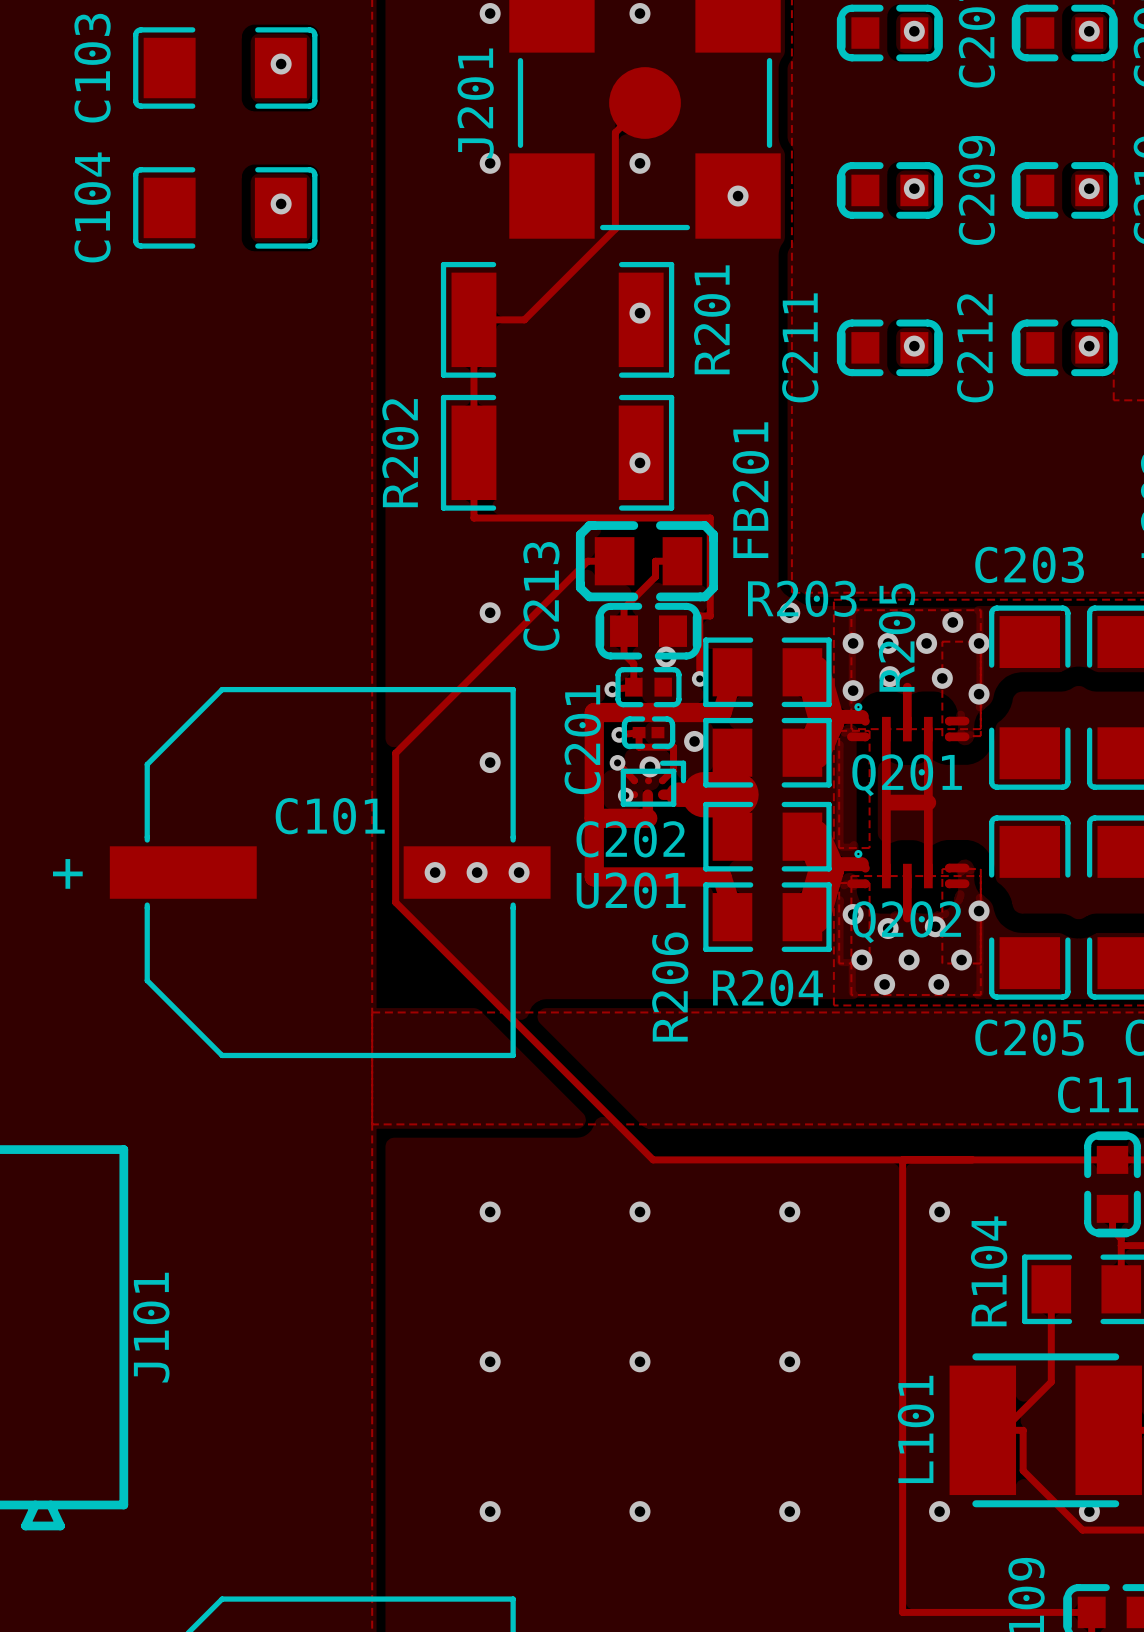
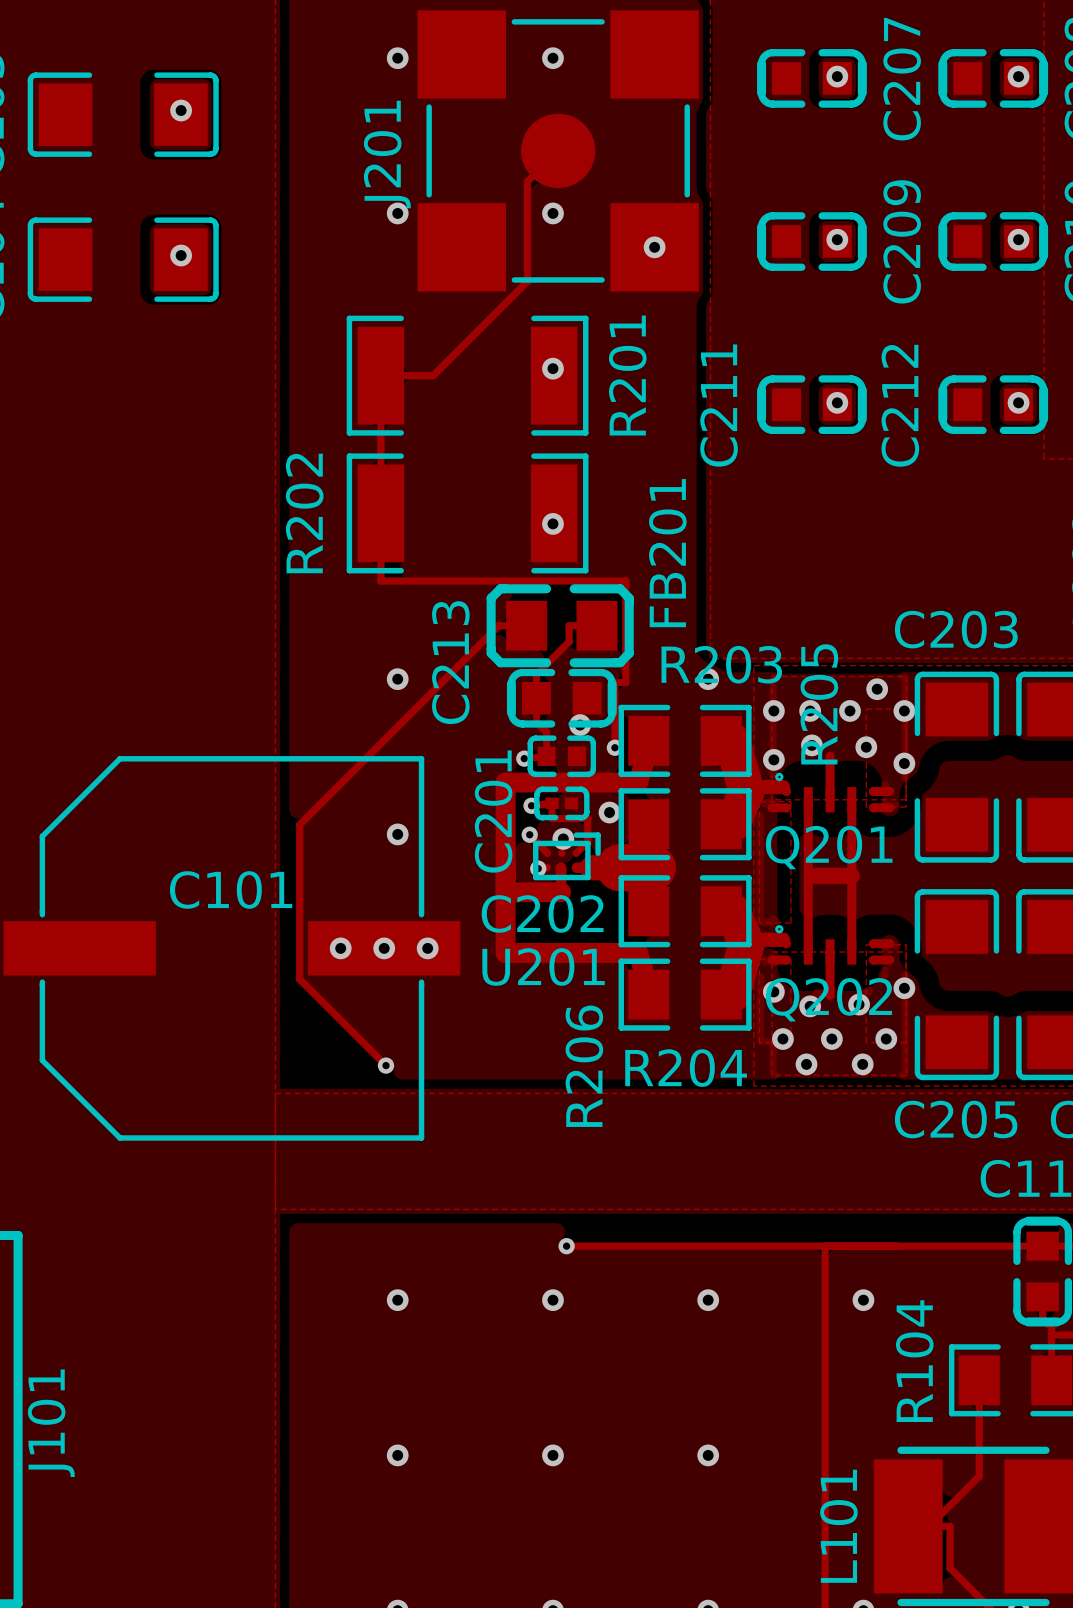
track: (478, 985) (653, 1159) -> none
via: none -> (386, 1065)
via: none -> (566, 1246)

